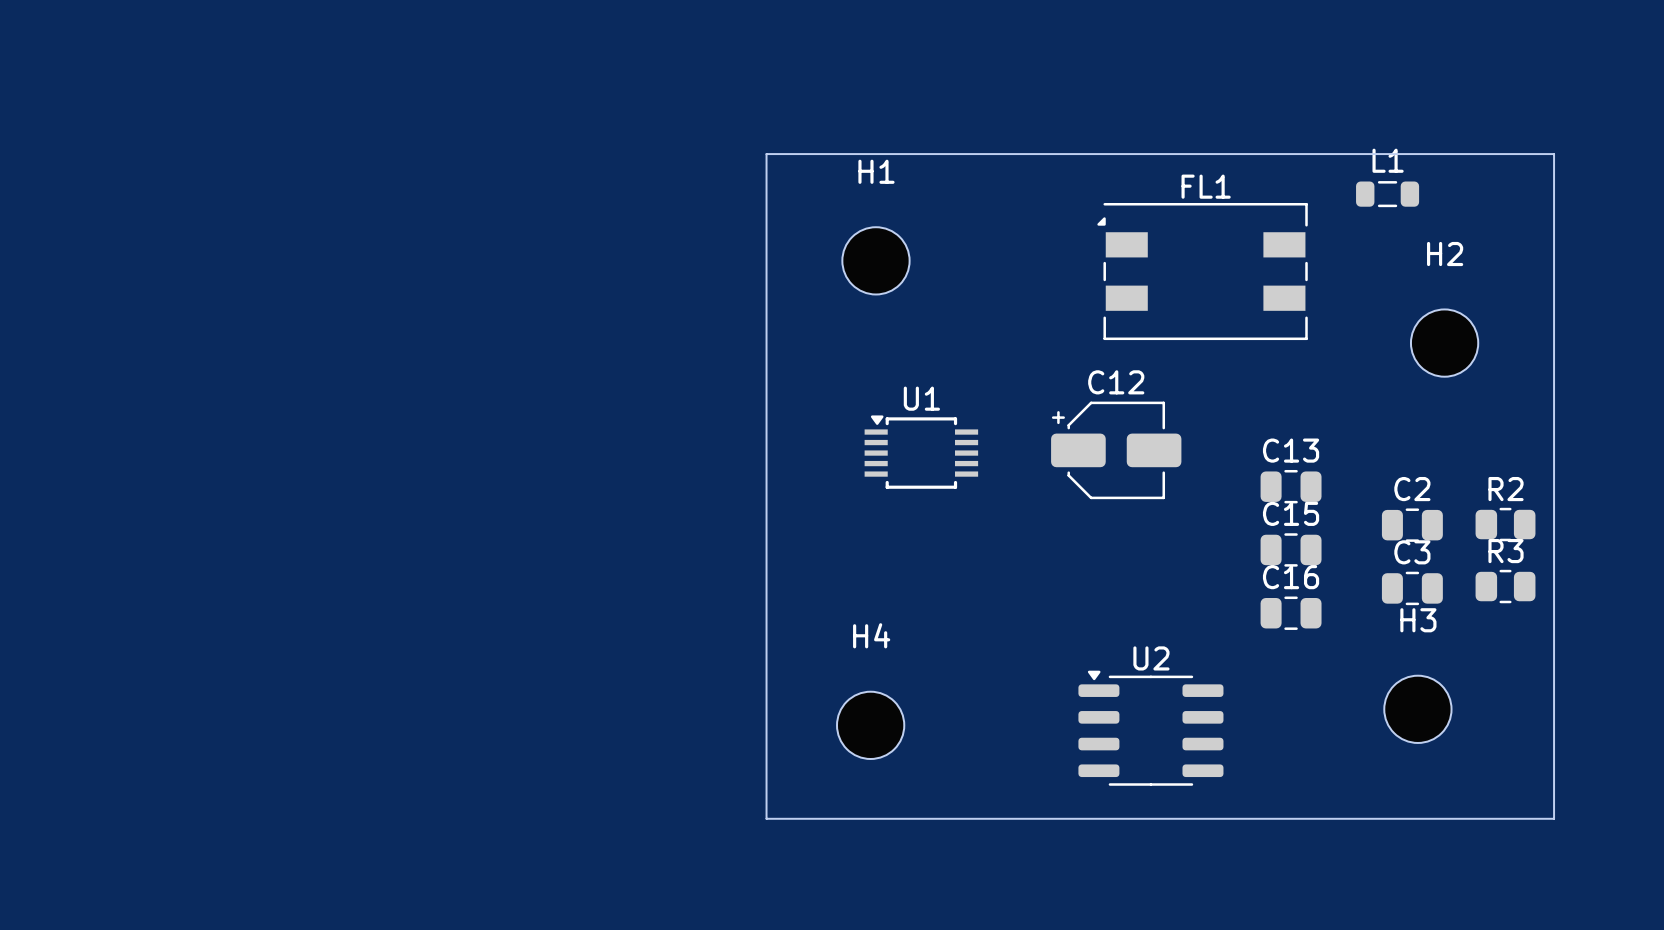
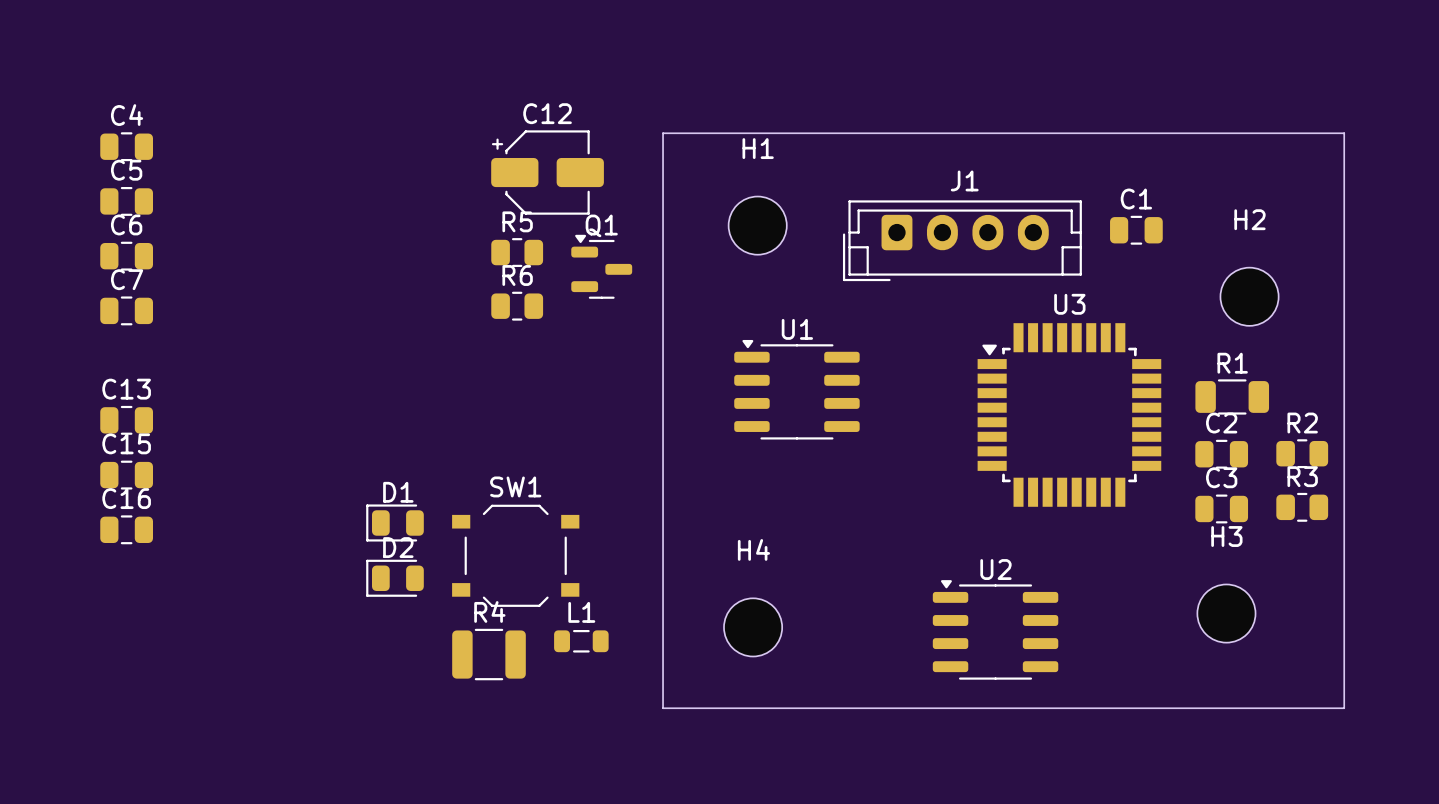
C4: none -> (126, 146)
L1 position: (1387, 194) -> (581, 641)
C5: none -> (126, 201)
C1: none -> (1136, 230)
FL1: (1202, 271) -> none
J1: none -> (962, 240)
R5: none -> (517, 252)
C6: none -> (126, 256)
Q1: none -> (601, 266)
R6: none -> (517, 306)
C7: none -> (126, 310)
U1 footprint: [864, 415, 979, 489] -> [734, 339, 860, 440]
C12 position: (1116, 450) -> (547, 172)
R1: none -> (1232, 396)
U3: none -> (1069, 414)
C13 position: (1291, 486) -> (126, 420)
C15 position: (1291, 549) -> (126, 475)
D1: none -> (394, 522)
C16 position: (1291, 613) -> (126, 529)
SW1: none -> (515, 555)
D2: none -> (394, 578)
R4: none -> (488, 654)

